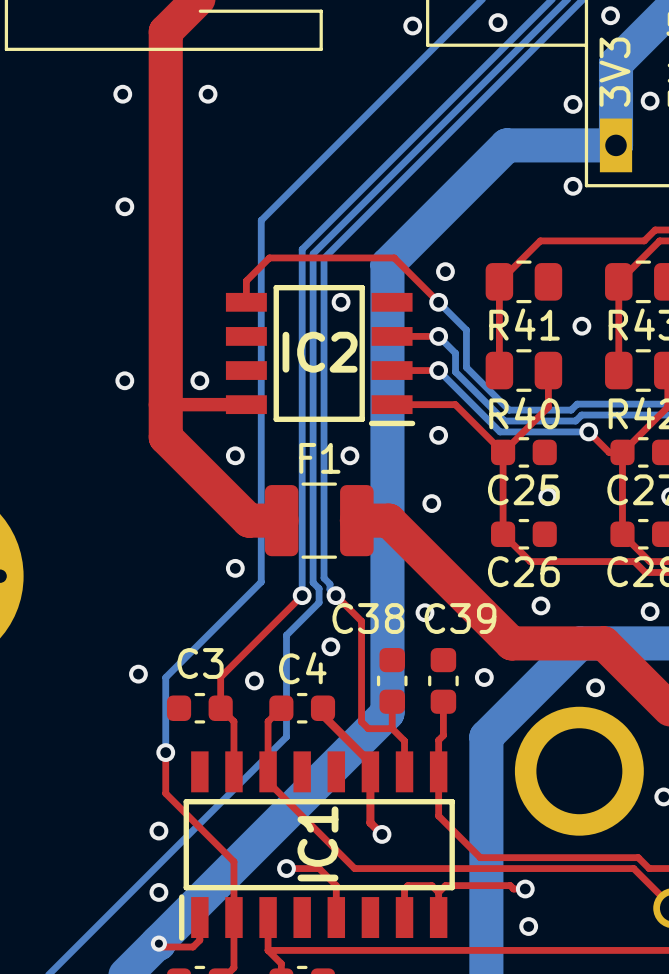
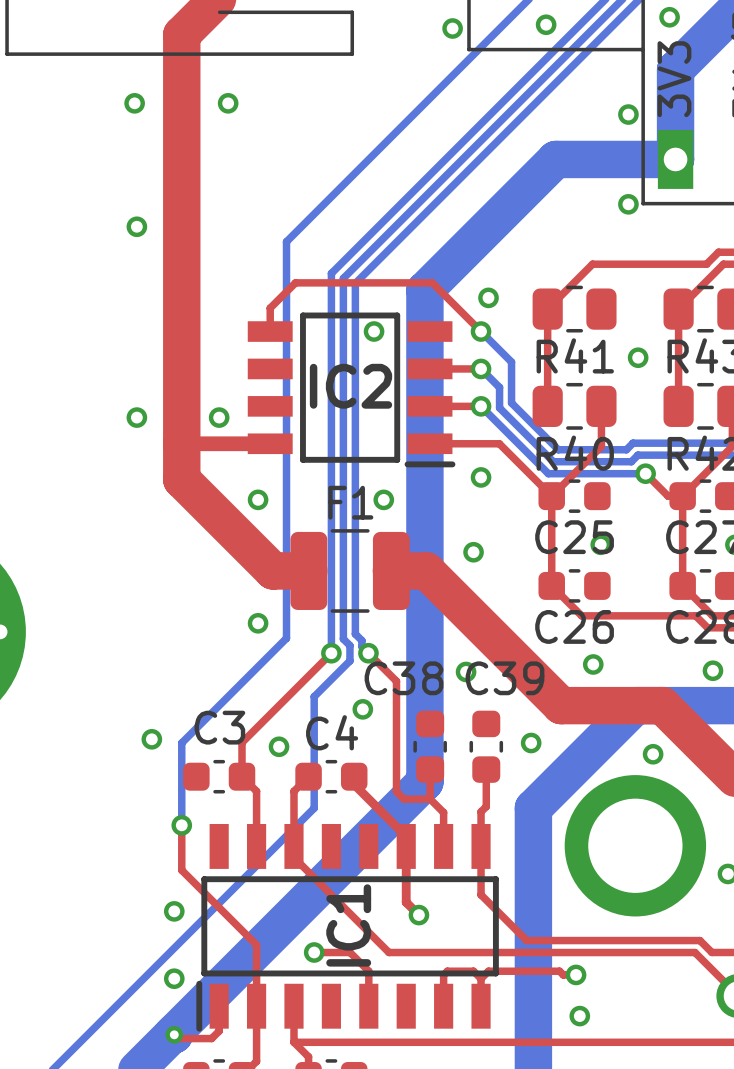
via: (650, 101) -> none

